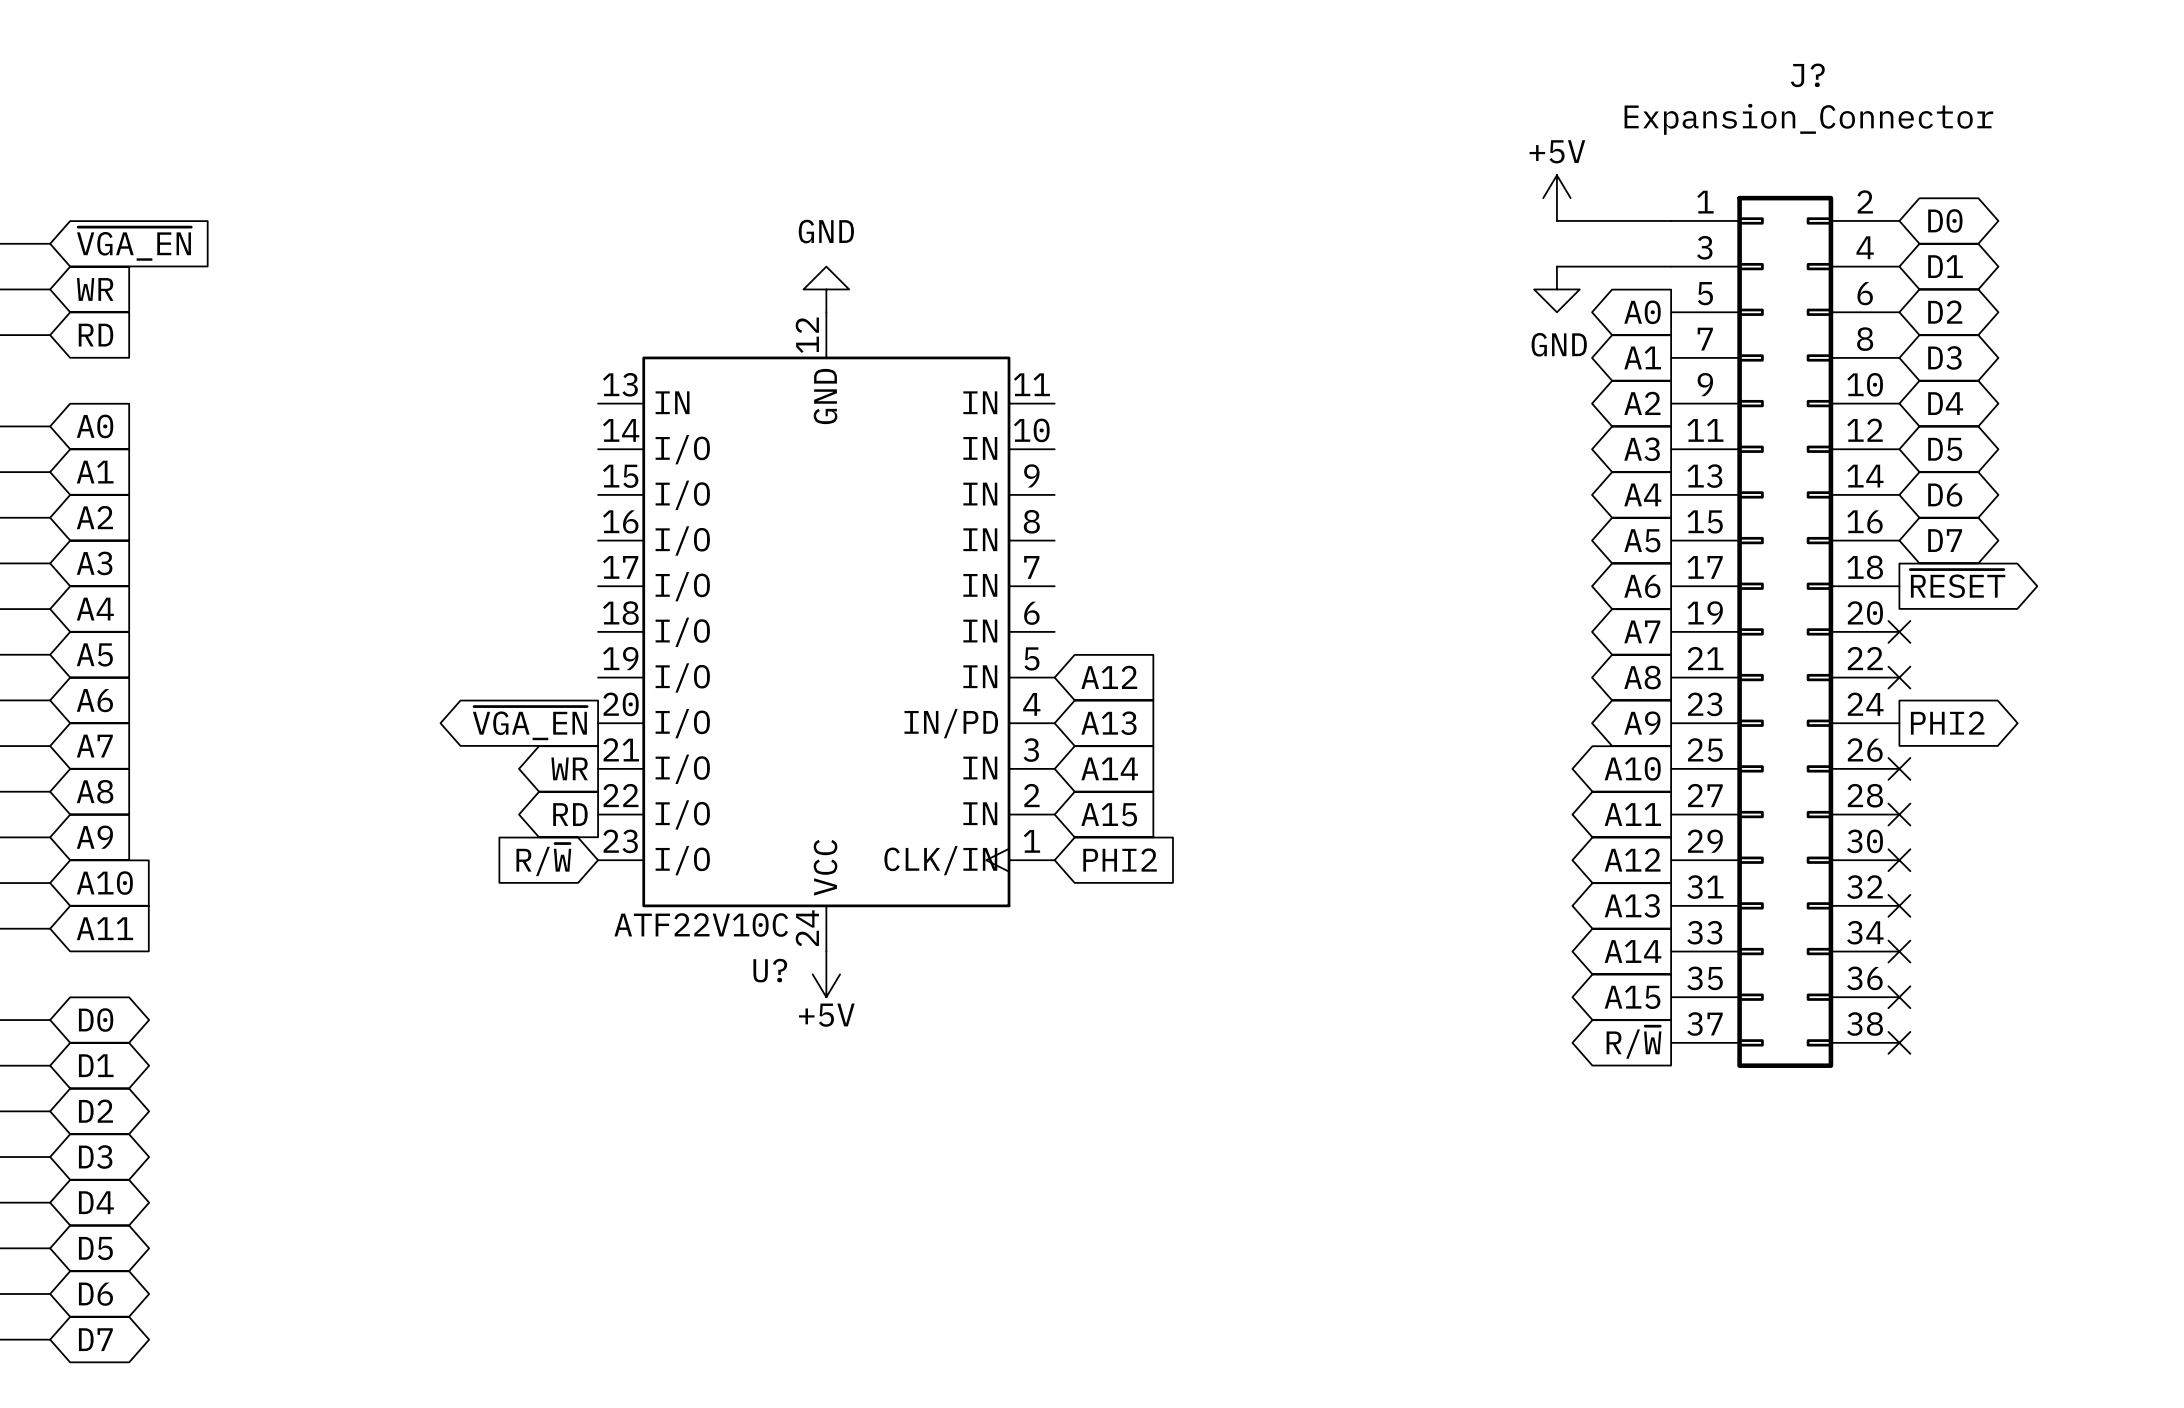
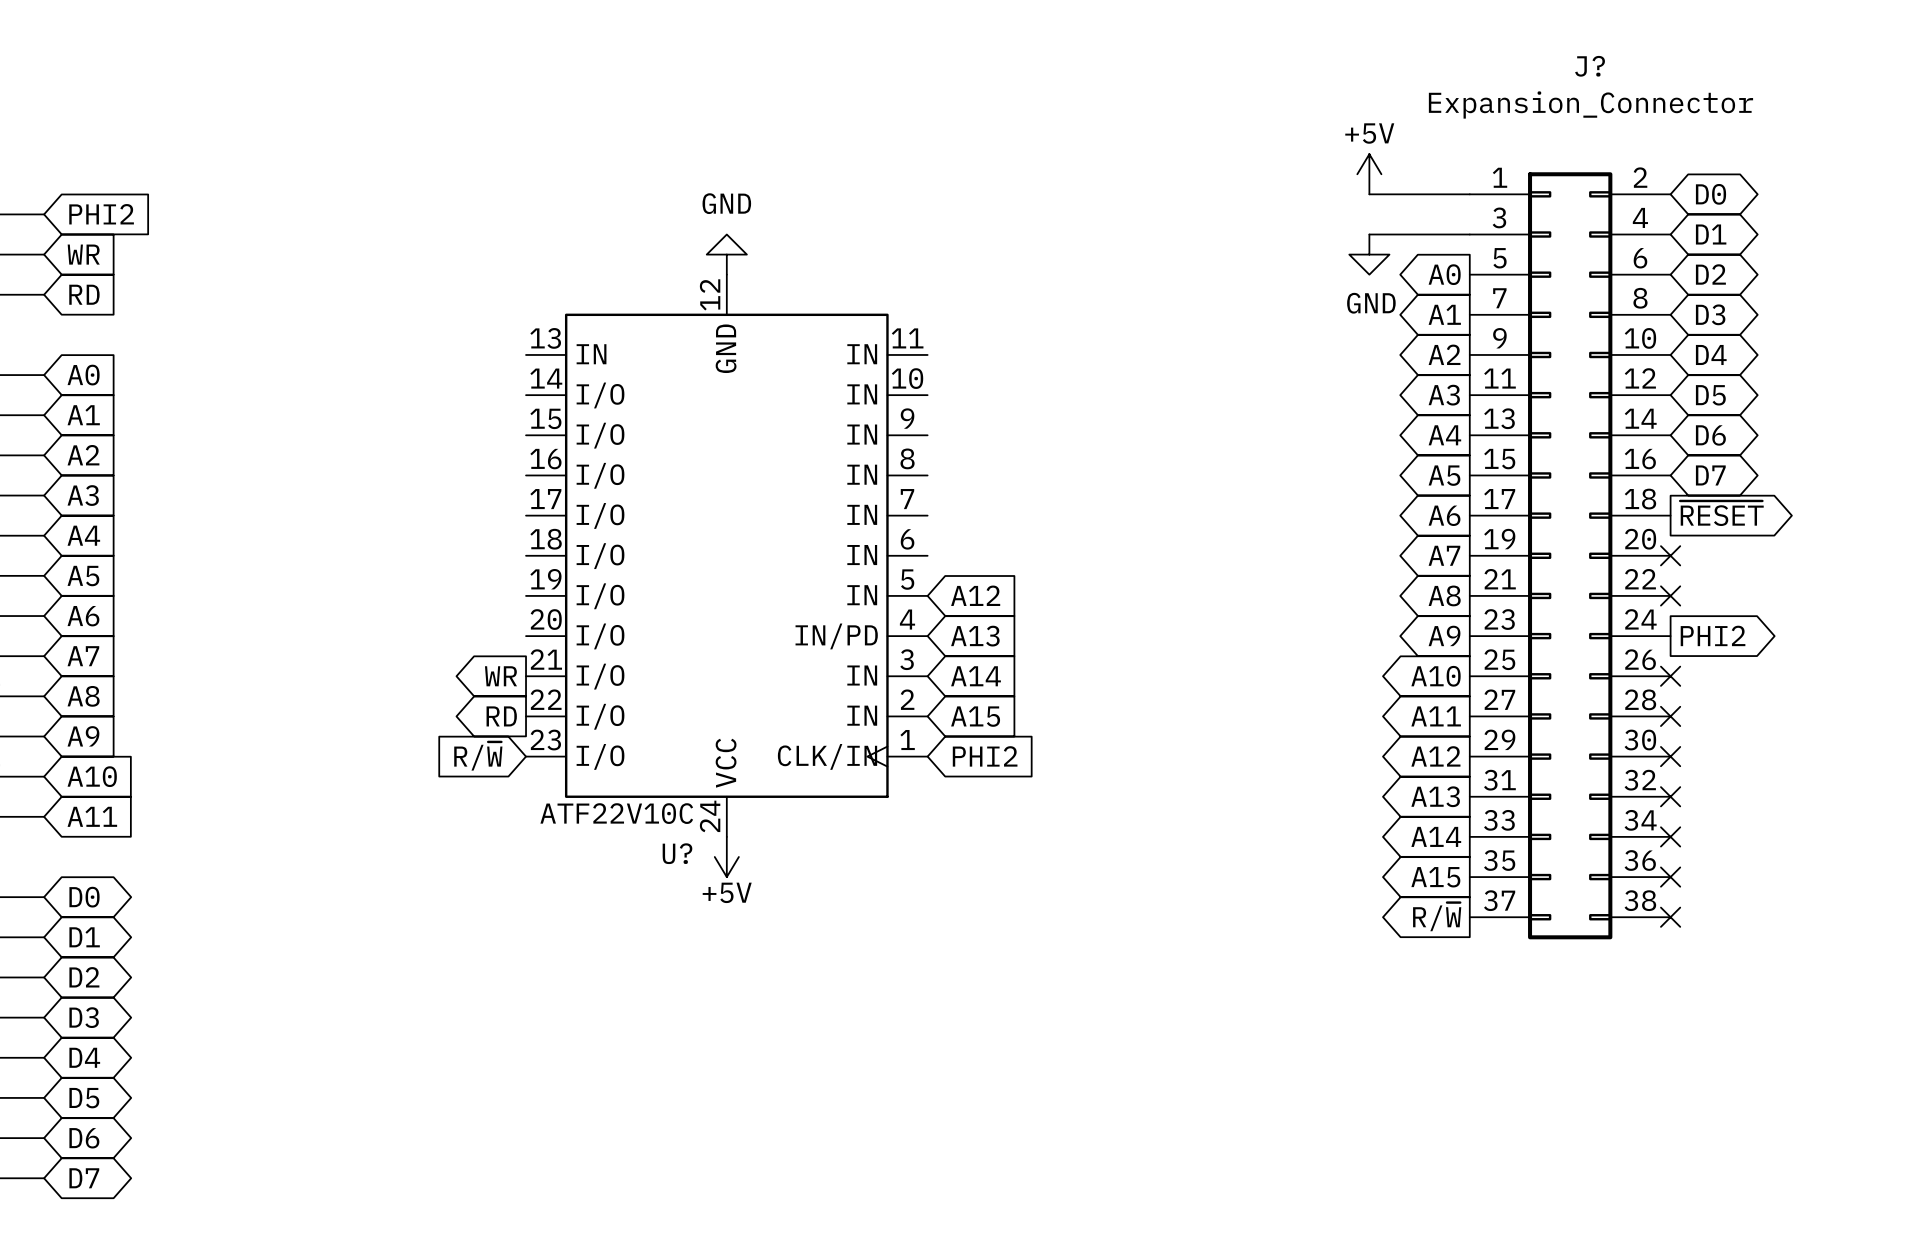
global label: ~{VGA_EN} (134, 243) -> PHI2 (101, 214)
global label: ~{VGA_EN} (530, 723) -> none

